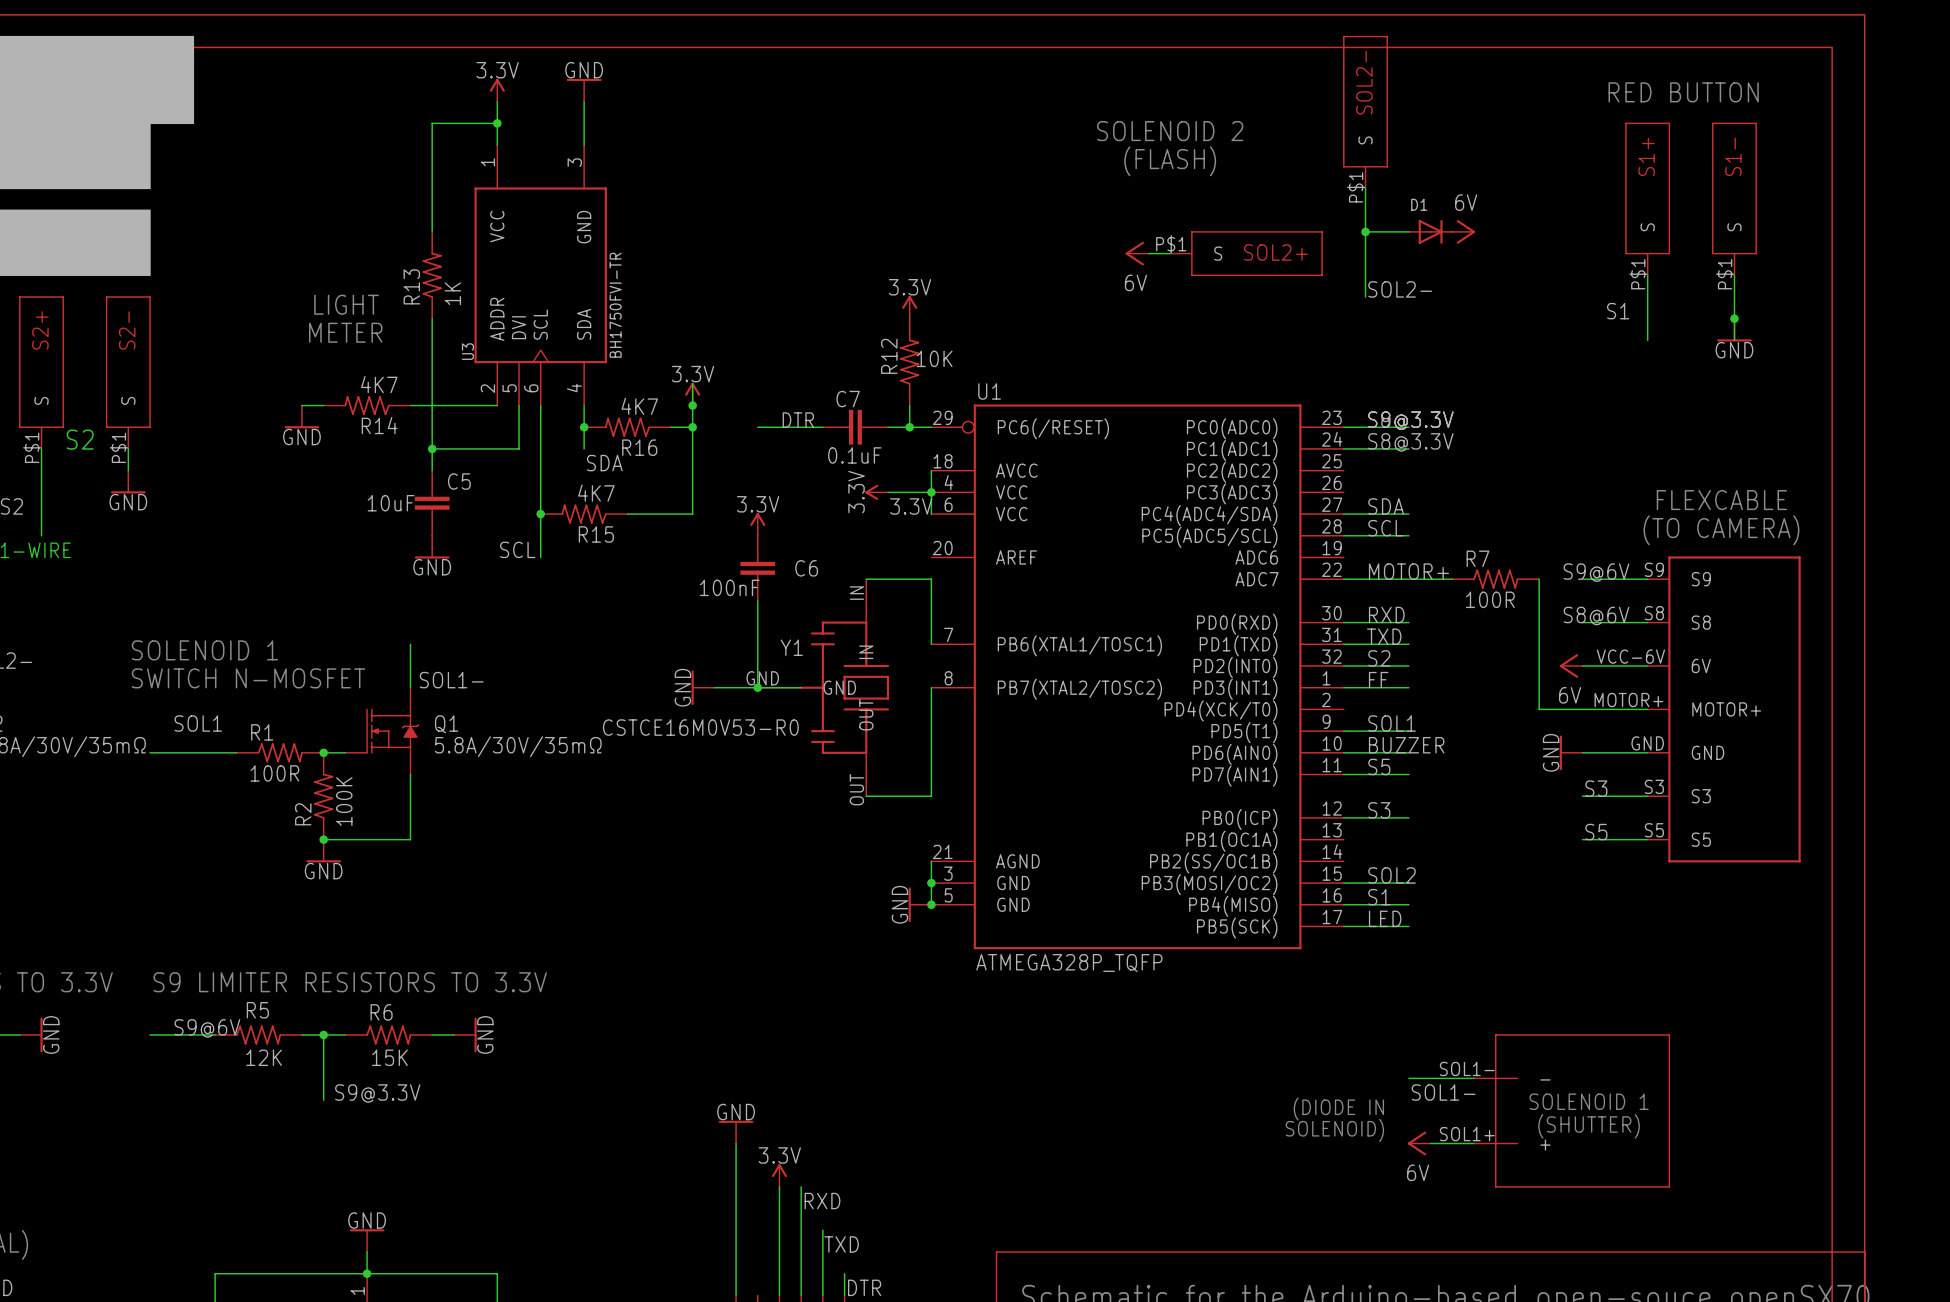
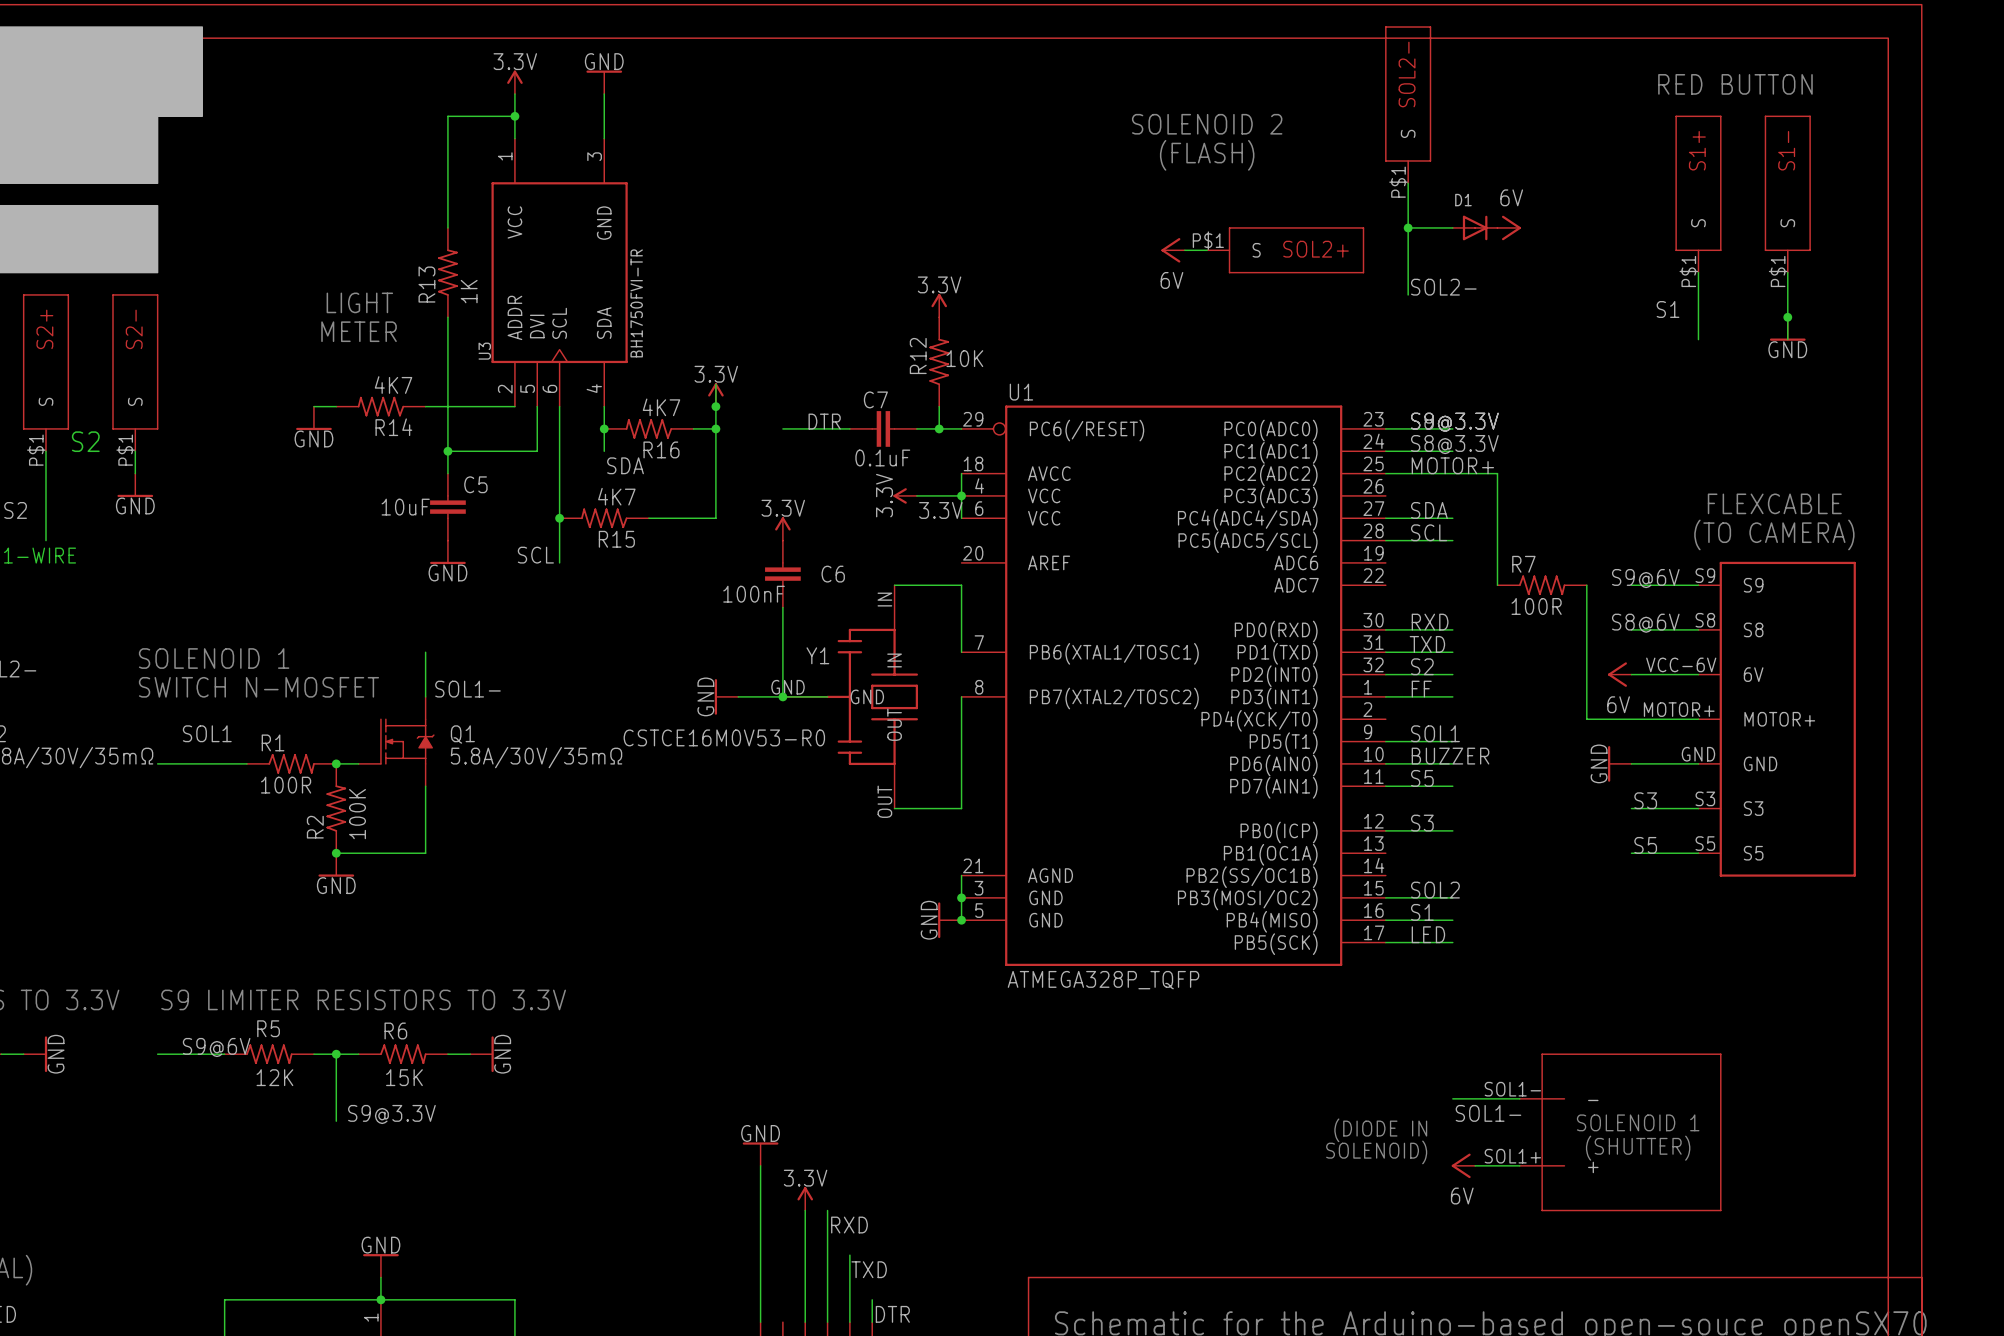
label position: MOTOR+ (1408, 571) -> MOTOR+ (1452, 465)
wire: (1343, 579) (1452, 579) -> (1385, 473) (1497, 473) (1497, 585)

